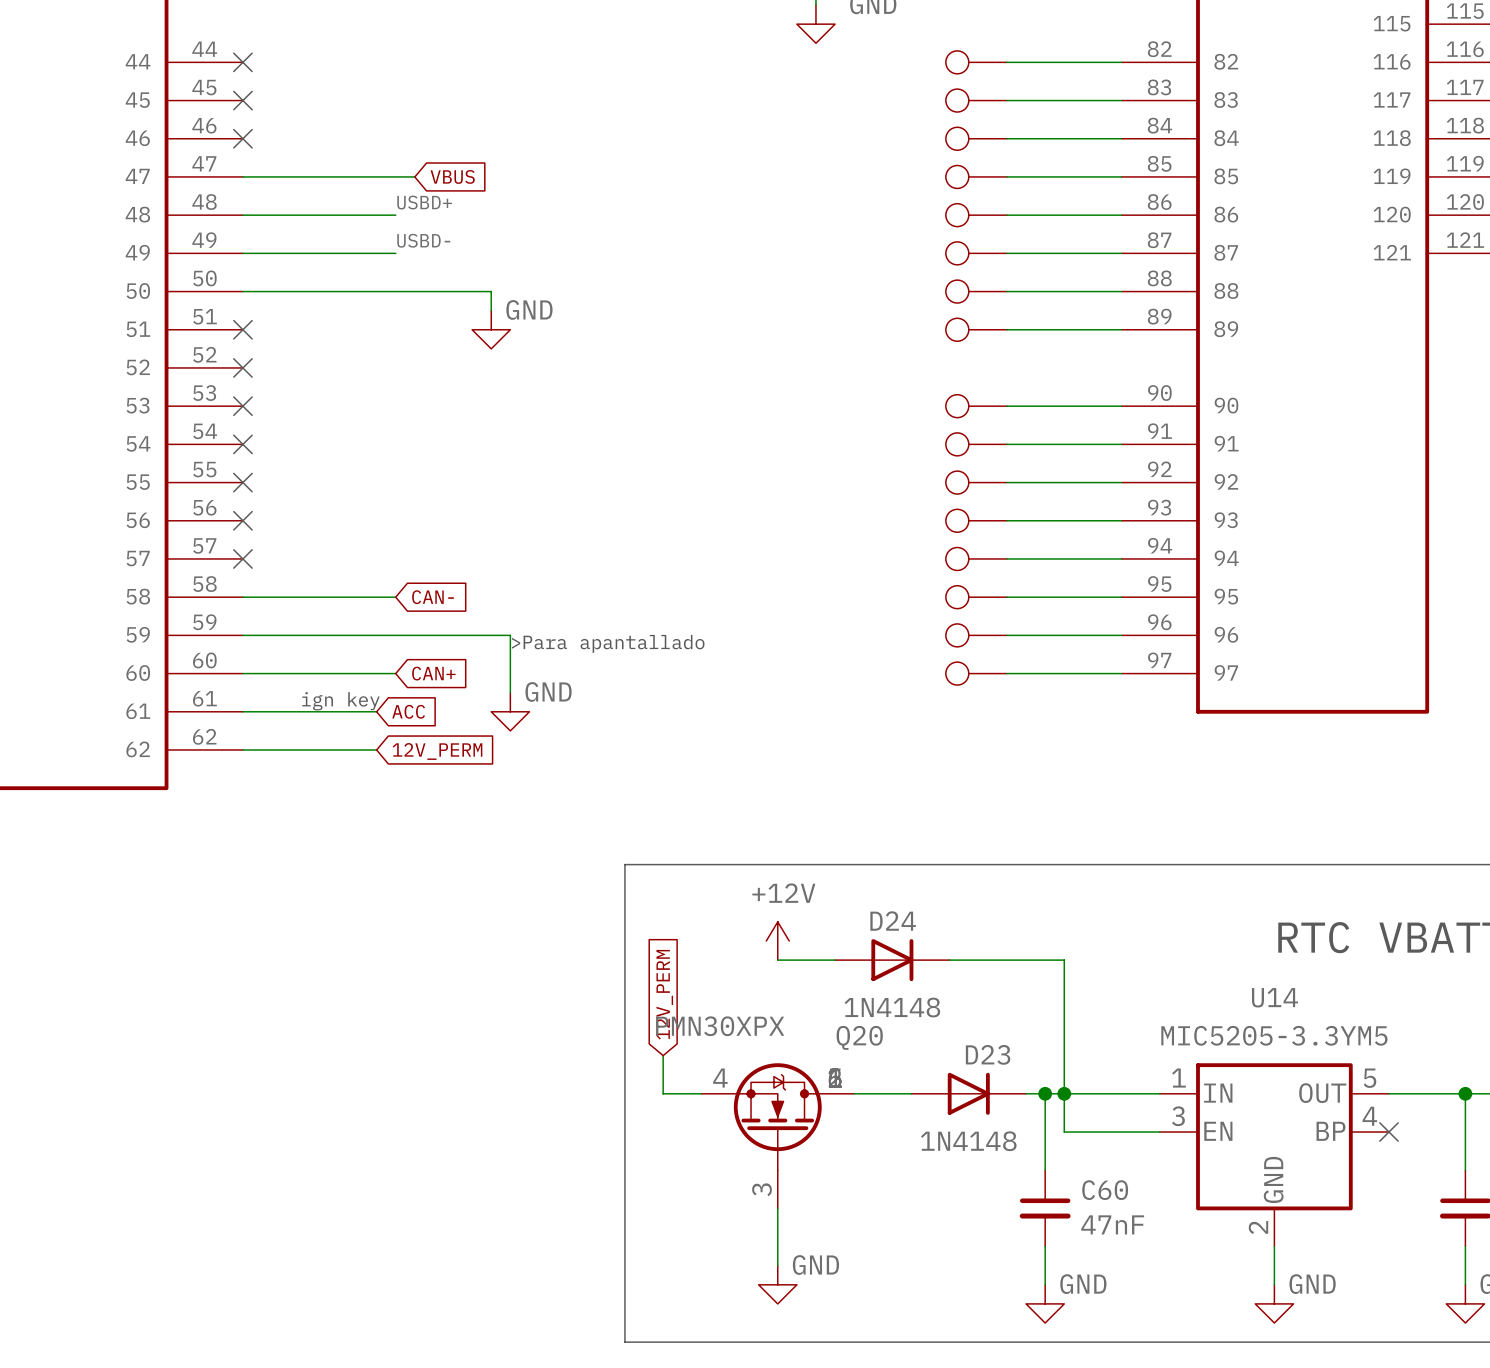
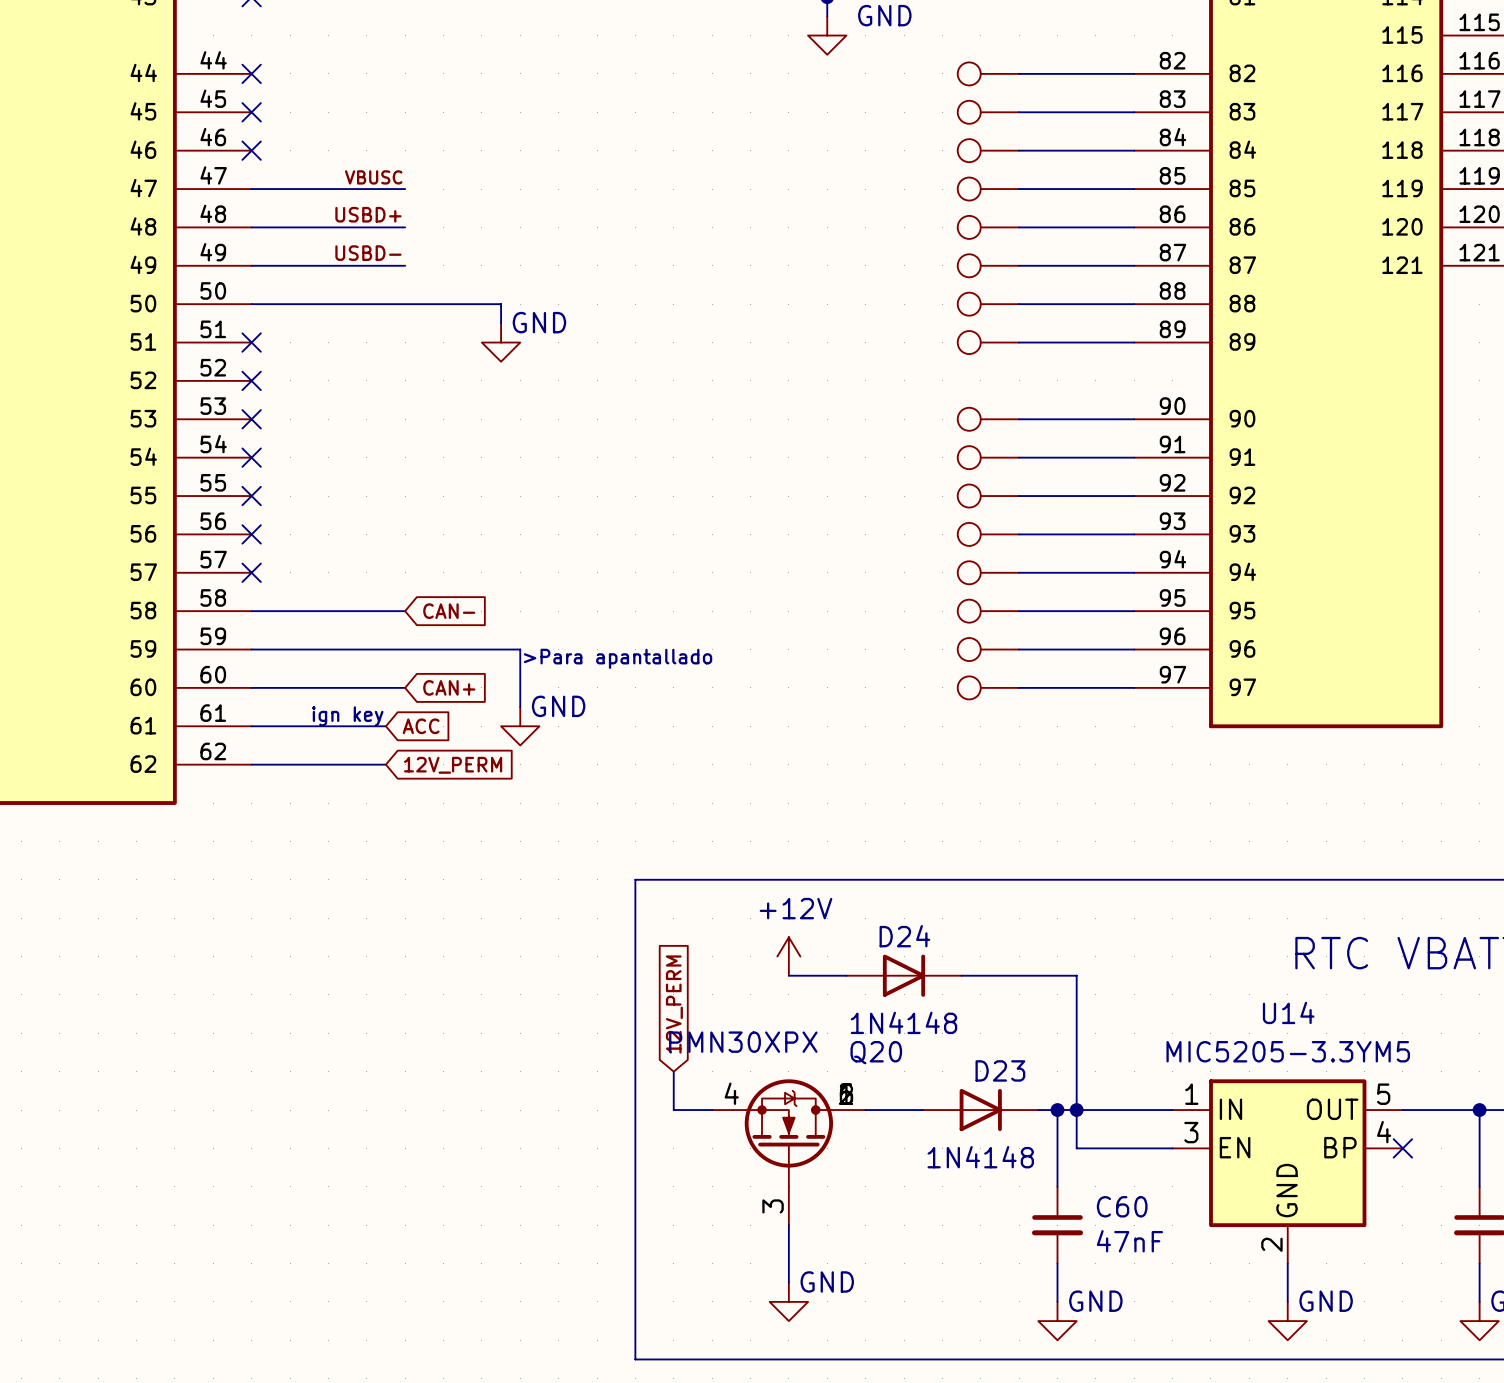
label: none -> VBUSC (373, 177)
wire: (395, 176) (414, 176) -> none
global label: VBUS (452, 176) -> none
label position: USBD+ (424, 202) -> USBD+ (368, 214)
label position: USBD- (423, 240) -> USBD- (368, 253)

